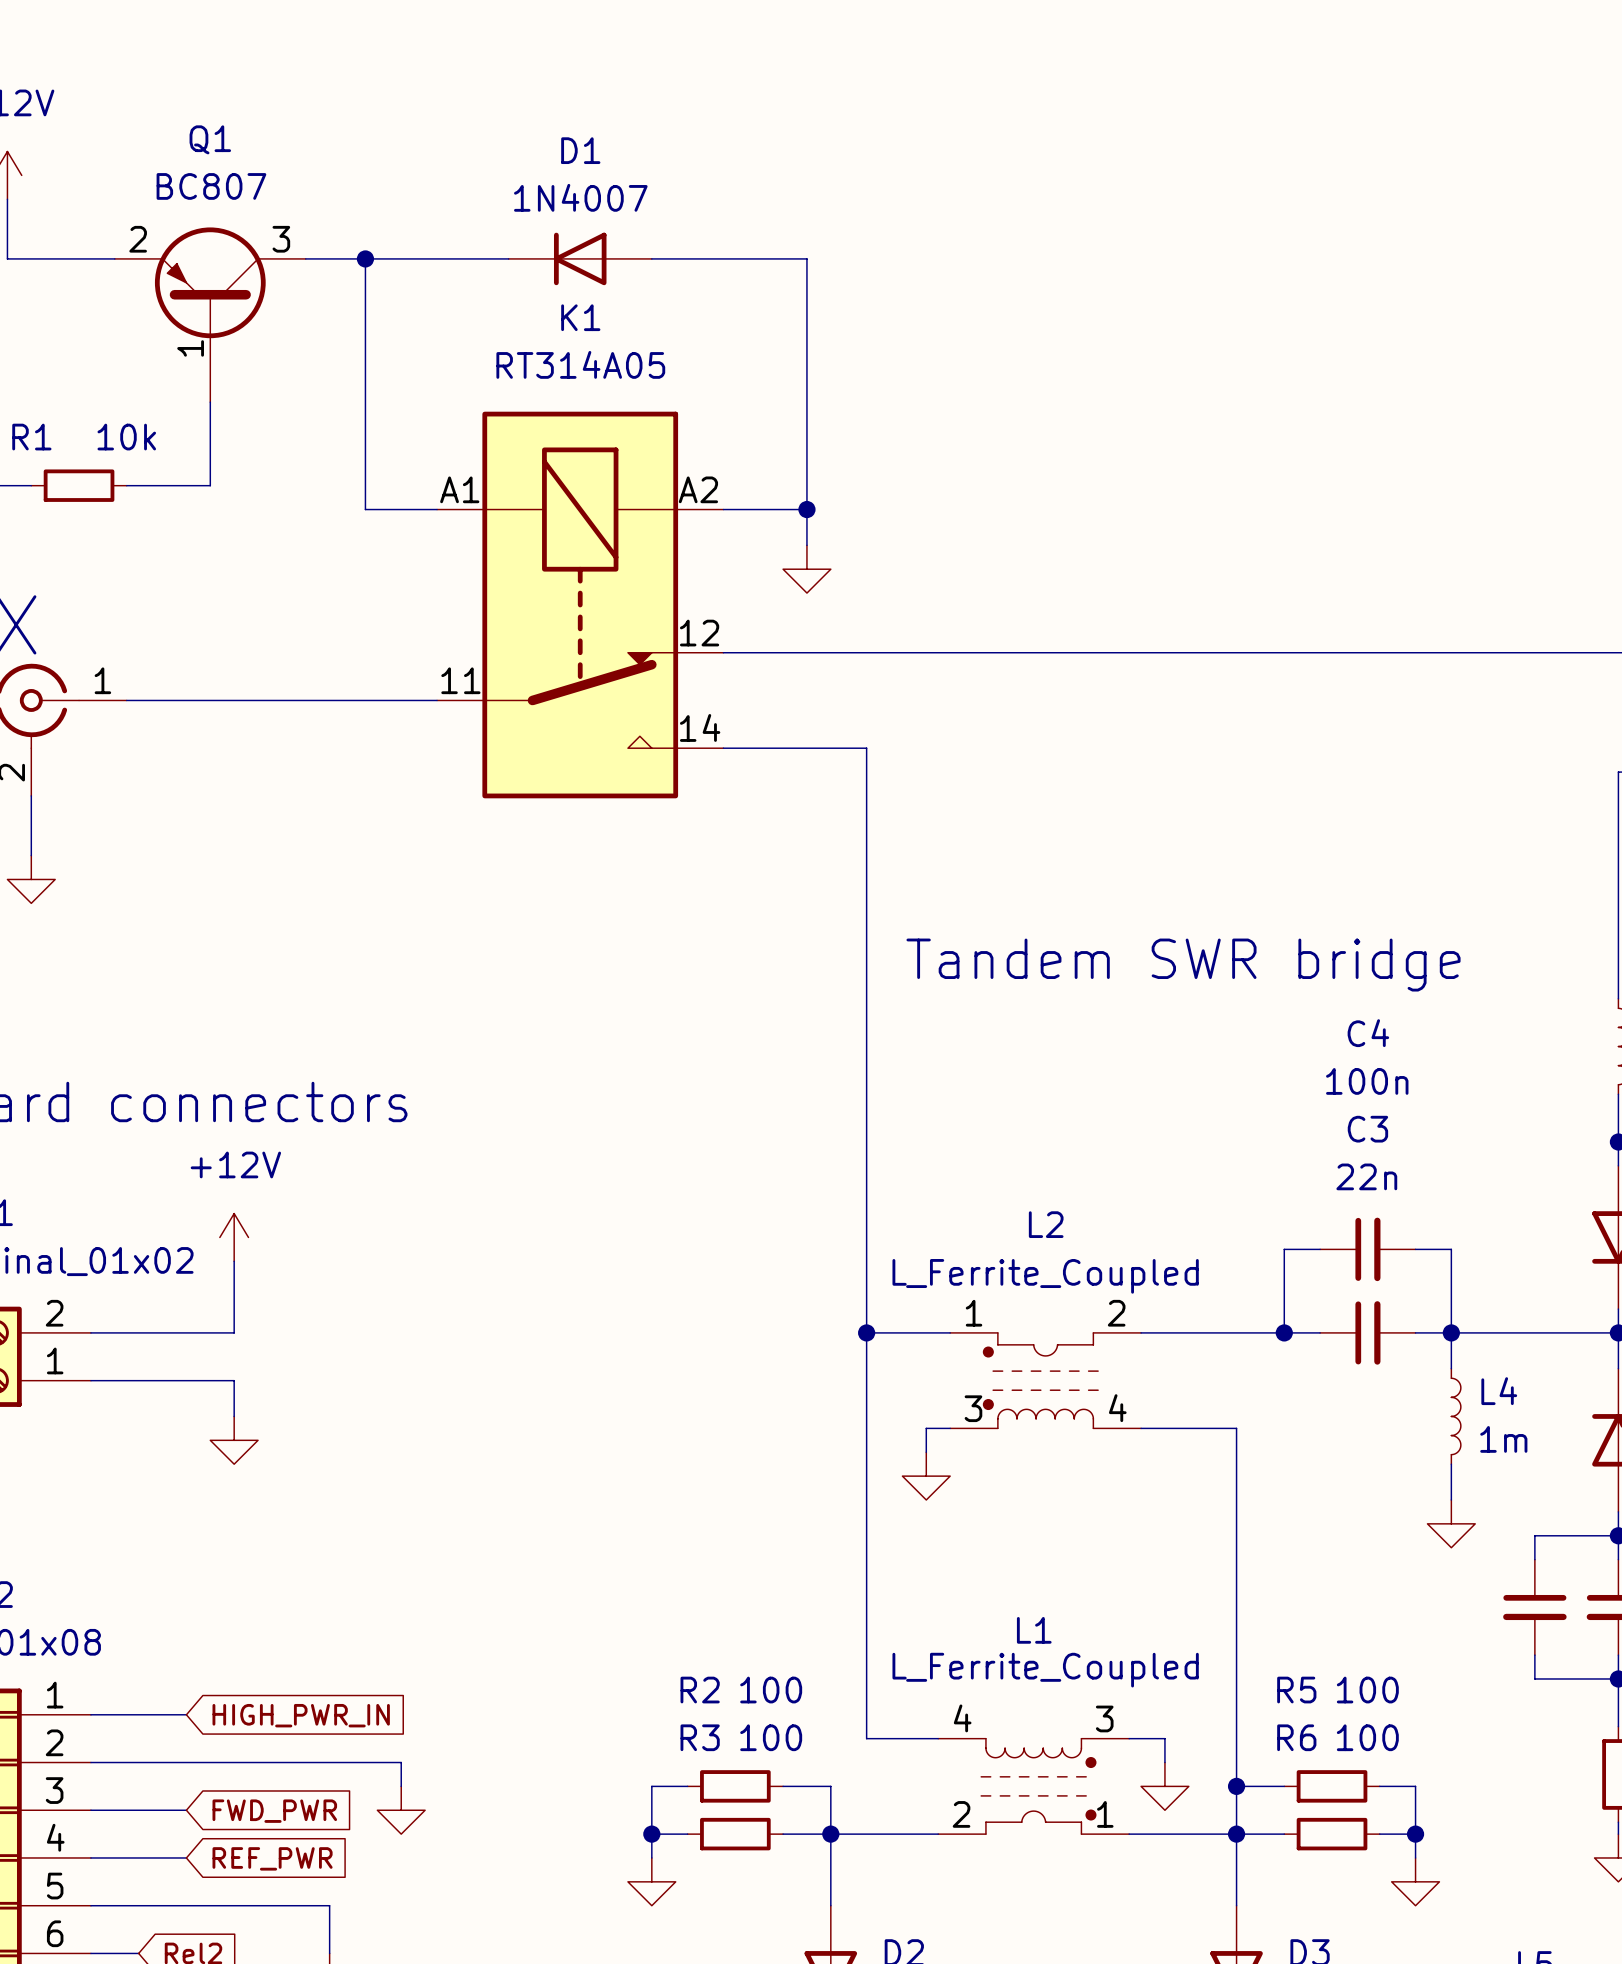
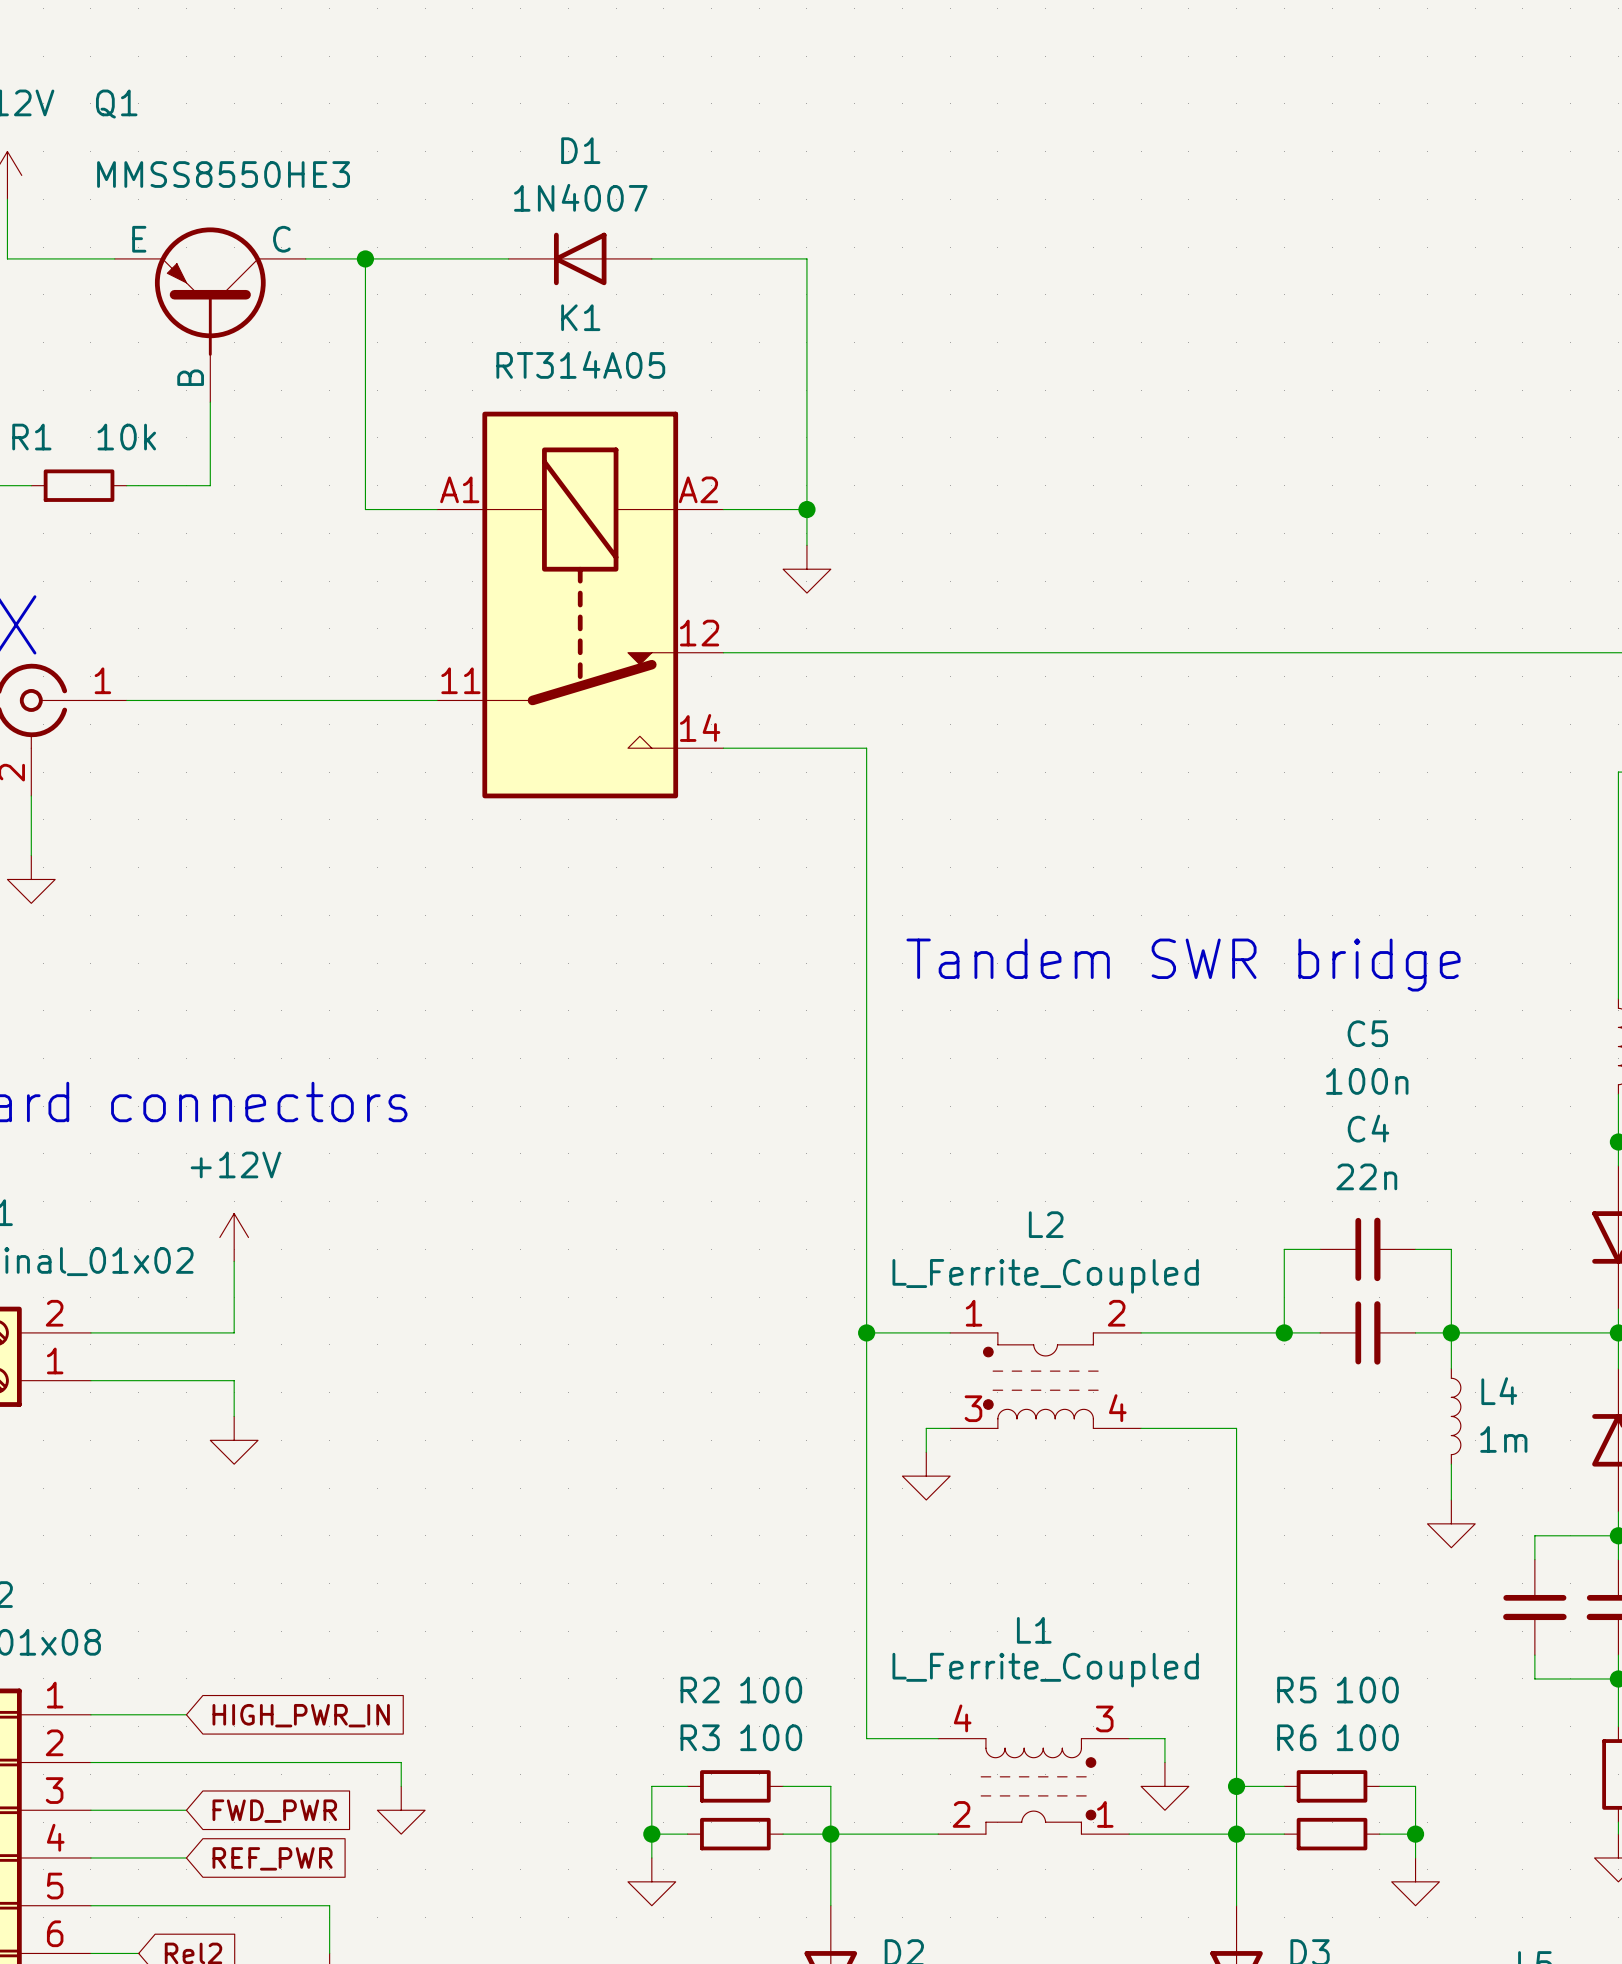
Q1 name position: Q1 (210, 139) -> Q1 (116, 104)
Q1 value: BC807 (211, 186) -> MMSS8550HE3 (223, 174)
Q1 symbol: [114, 227, 306, 403] -> [114, 227, 306, 403]
C4 name: C4 (1368, 1033) -> C5 (1367, 1033)
C3 name: C3 (1367, 1129) -> C4 (1368, 1128)

